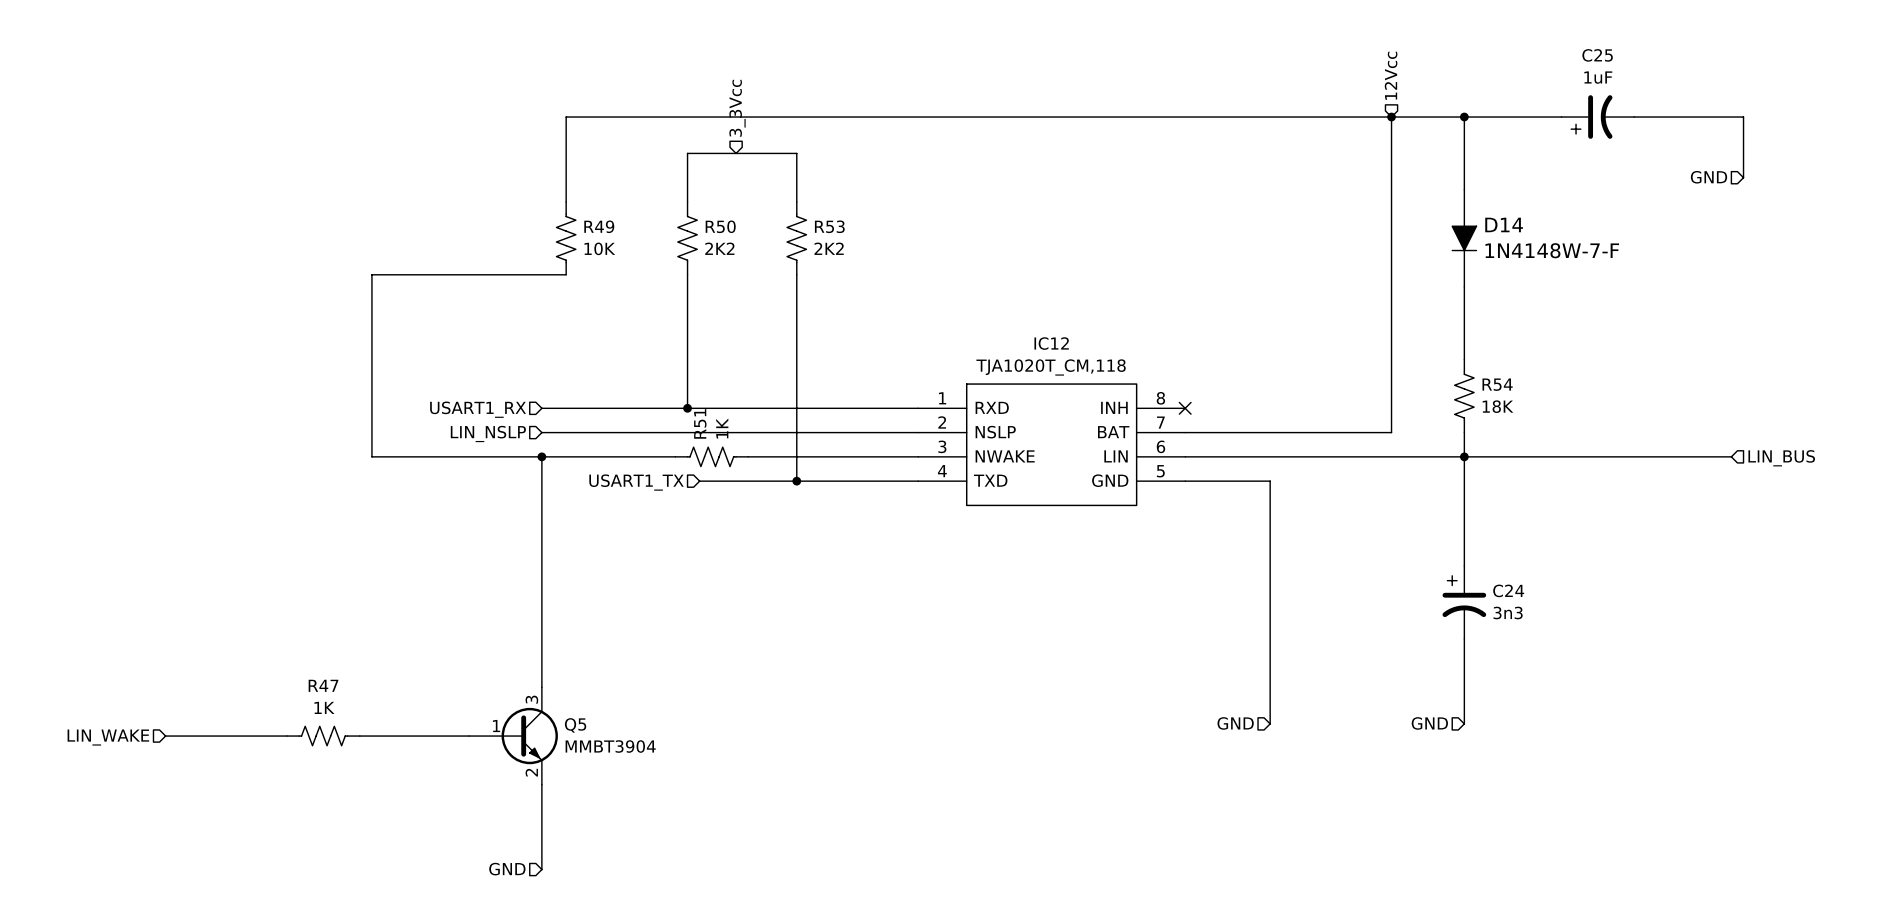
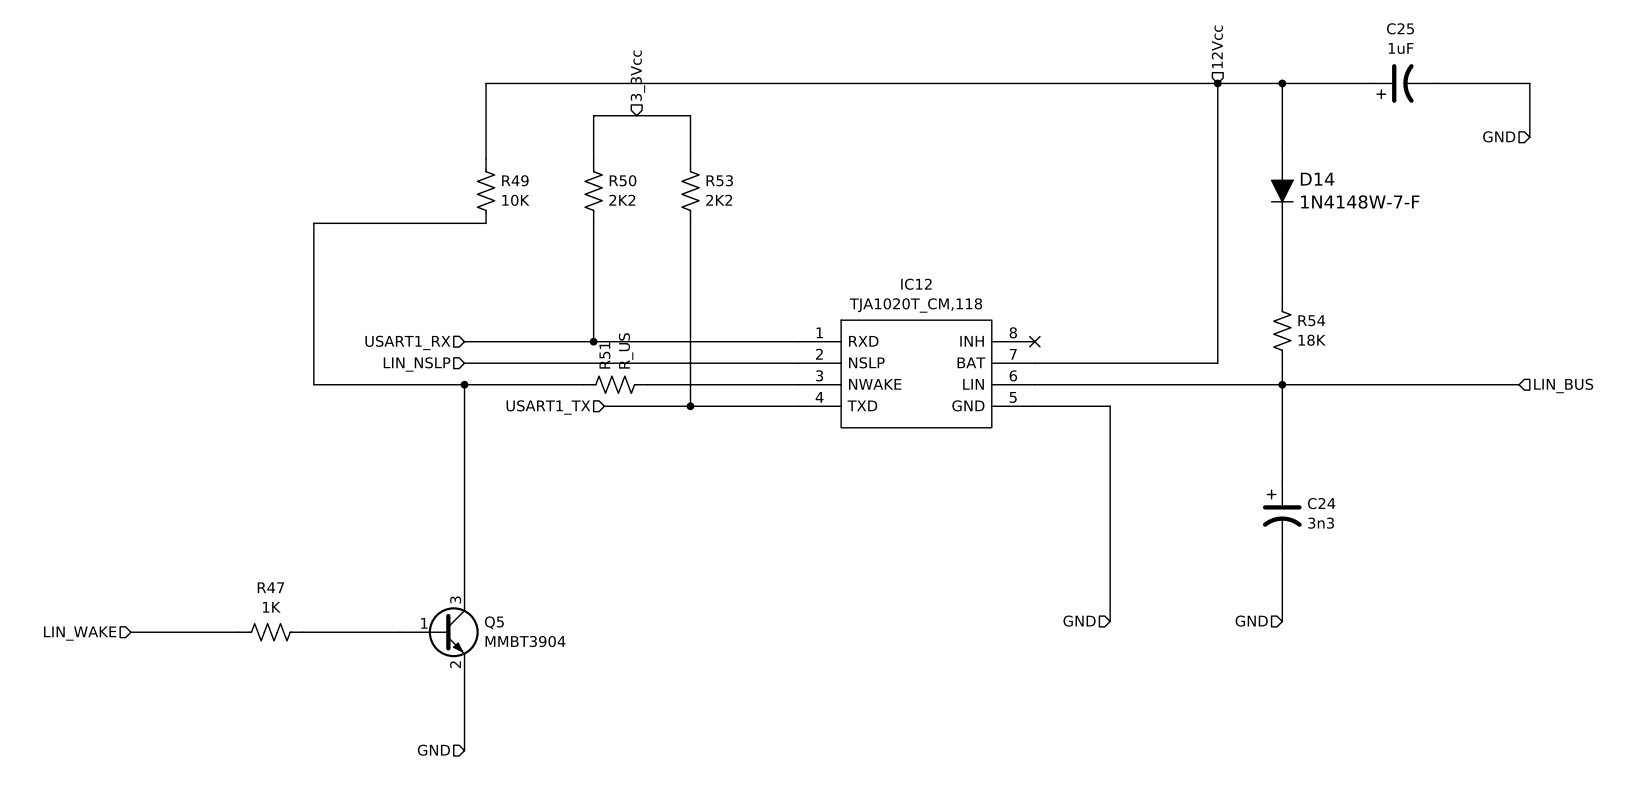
R51 value: 1K (722, 428) -> R_US (626, 350)

